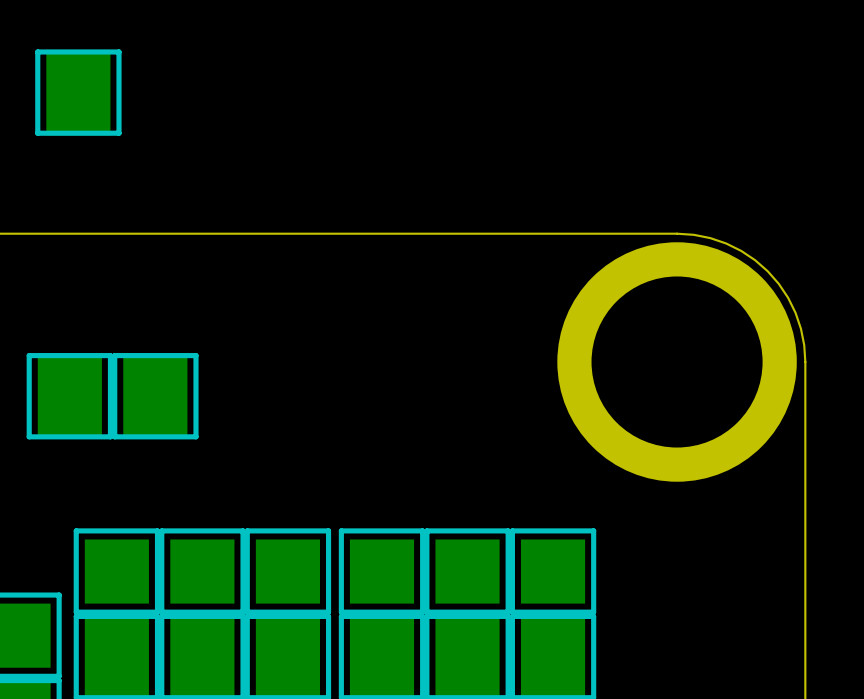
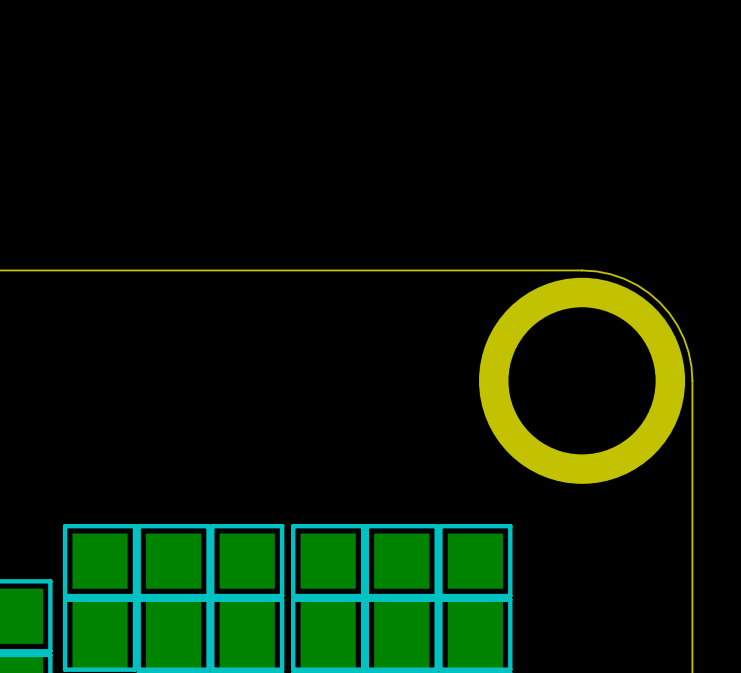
part: (78, 92) -> none
part: (69, 396) -> none
part: (155, 396) -> none

